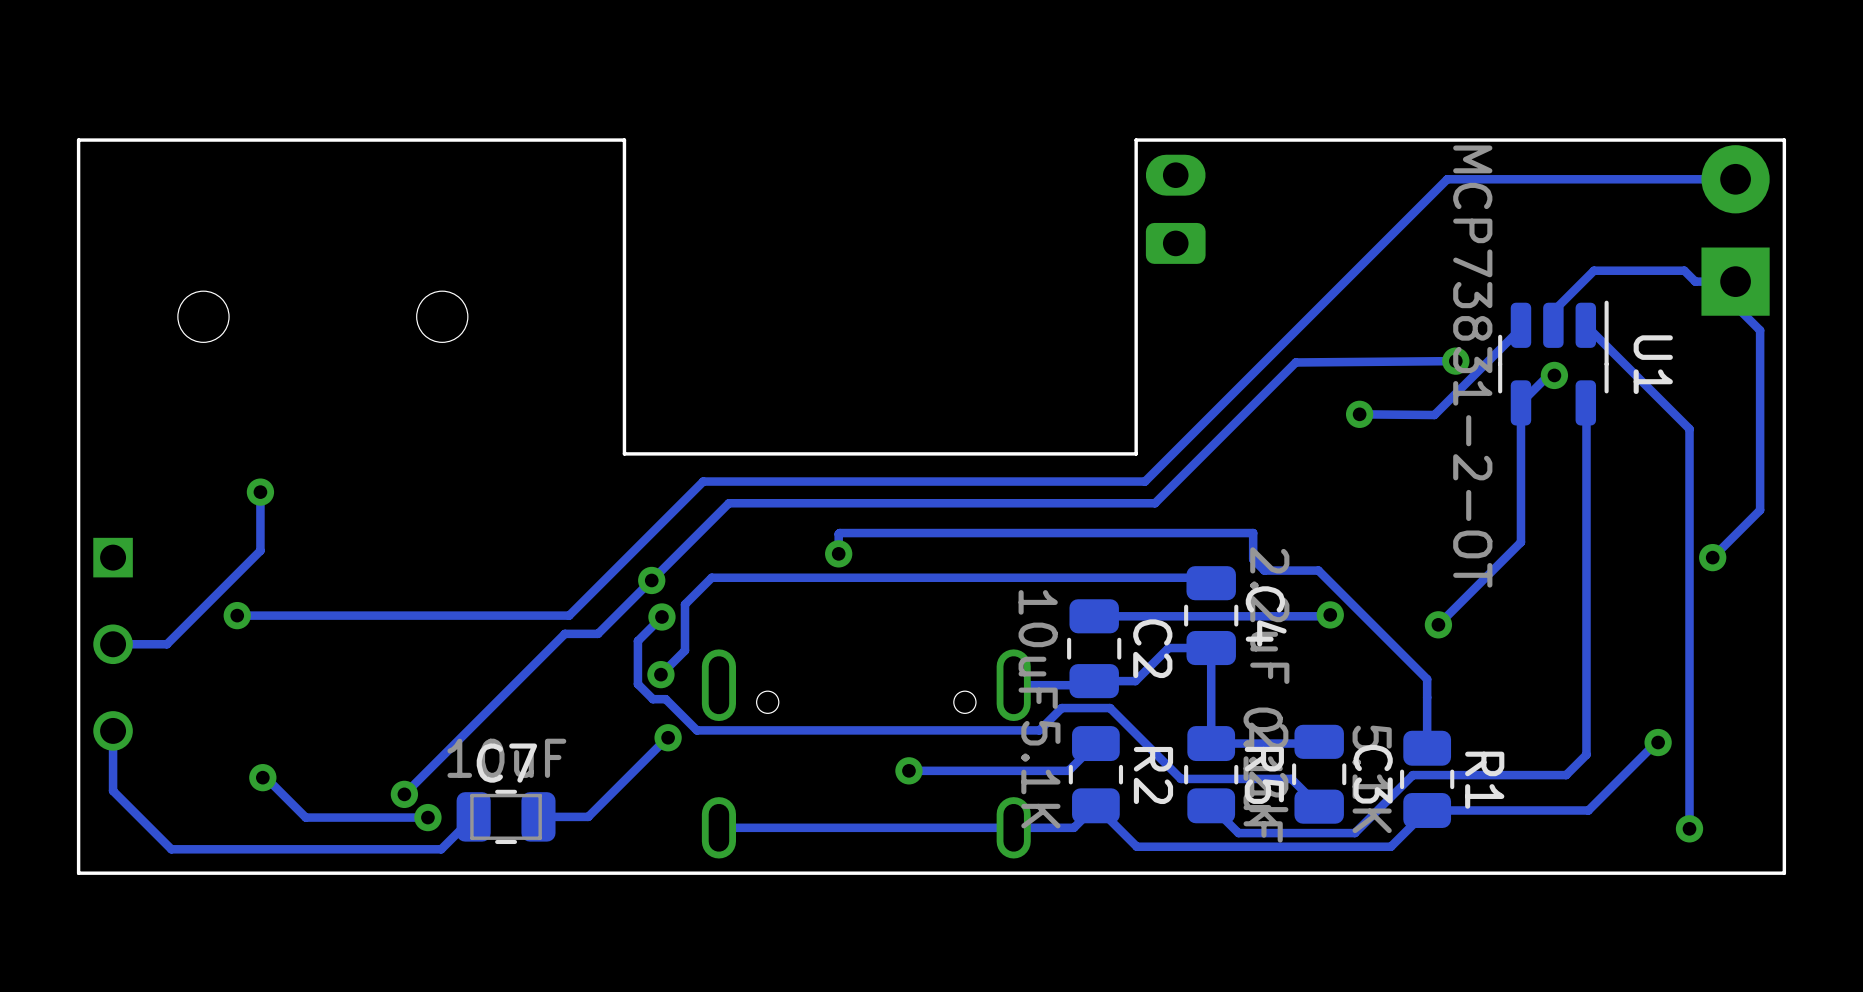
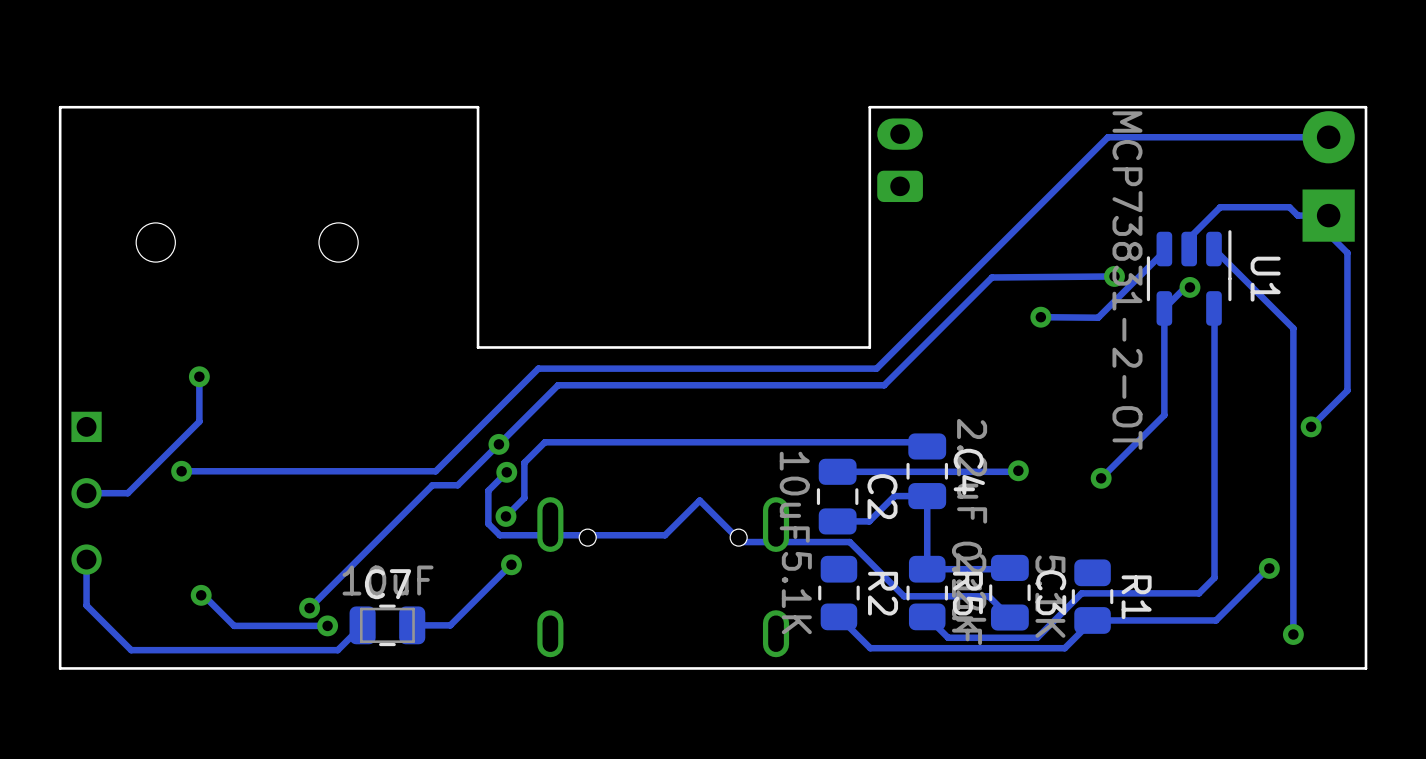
track: (838, 553) (839, 533) (1253, 533) (1253, 559) (1264, 570) (1318, 570) (1427, 679) (1427, 748) -> none
via: (838, 553) -> none
track: (1094, 681) (1090, 685) (1013, 685) -> none
track: (665, 699) (696, 730) (1039, 730) (1061, 708) -> (509, 535) (665, 535) (699, 500) (741, 542) (812, 542)
track: (1095, 743) (1068, 770) (908, 770) -> none
via: (908, 770) -> none
track: (1095, 805) (1073, 827) (718, 827) -> none

